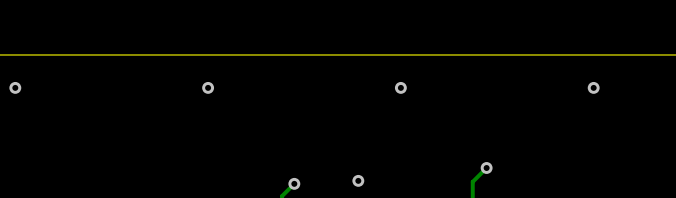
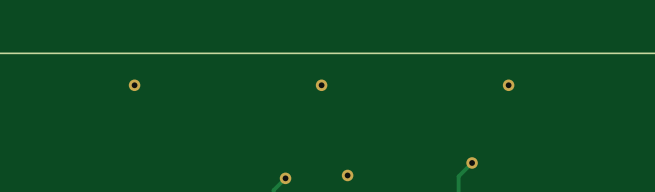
via: (15, 87) -> none
via: none -> (134, 85)
via: (208, 87) -> none
via: none -> (321, 85)
via: (400, 87) -> none
via: none -> (508, 85)
via: (593, 87) -> none

